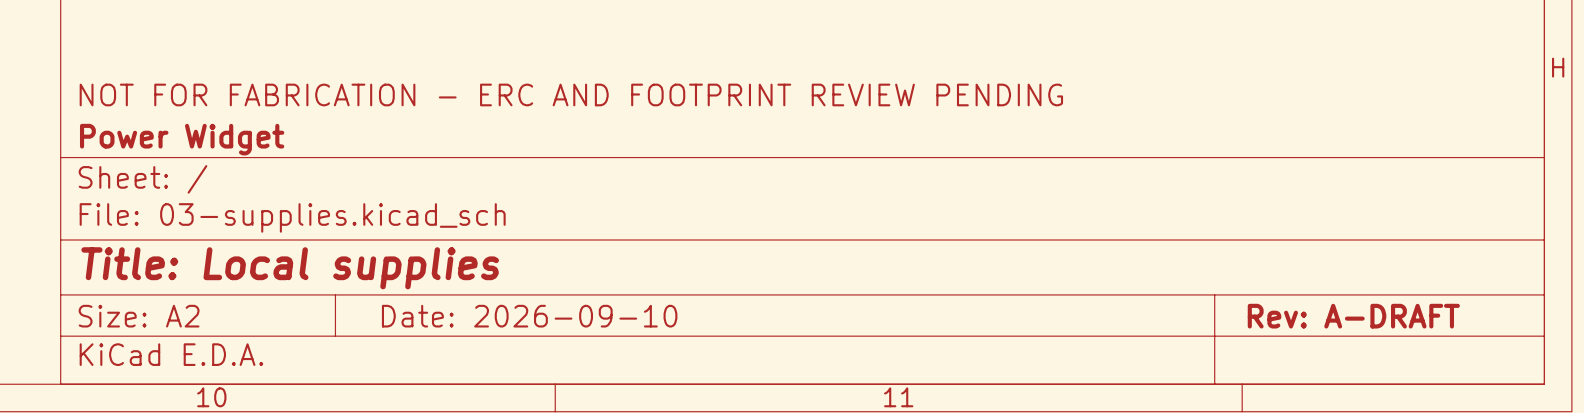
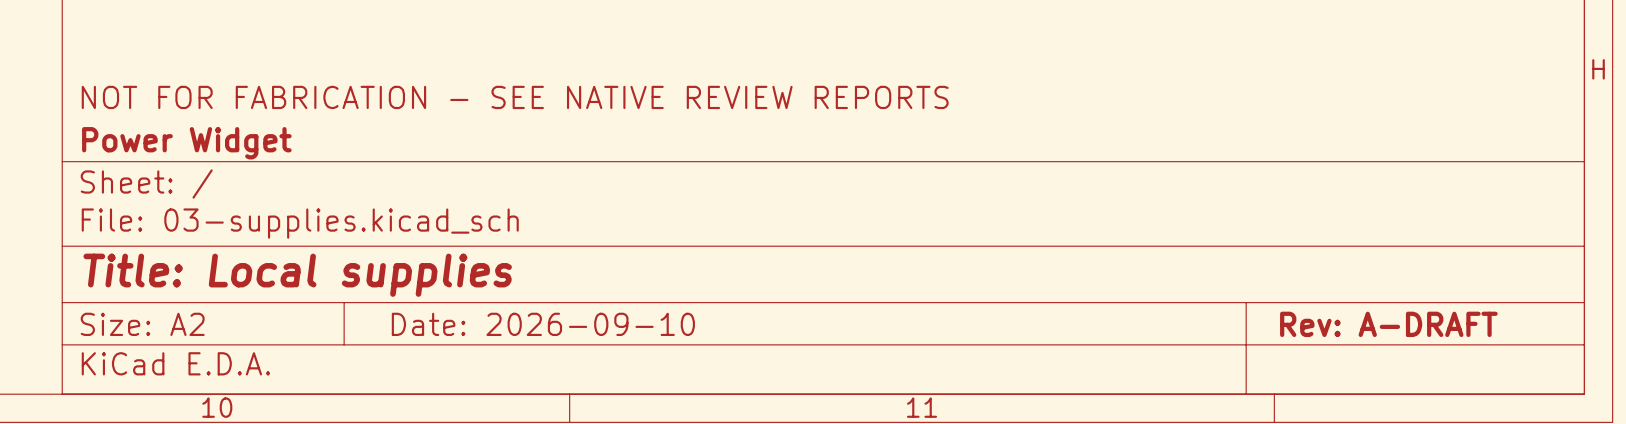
title block: NOT FOR FABRICATION - ERC AND FOOTPRINT REVIEW PENDING (571, 94) -> NOT FOR FABRICATION - SEE NATIVE REVIEW REPORTS (515, 97)

